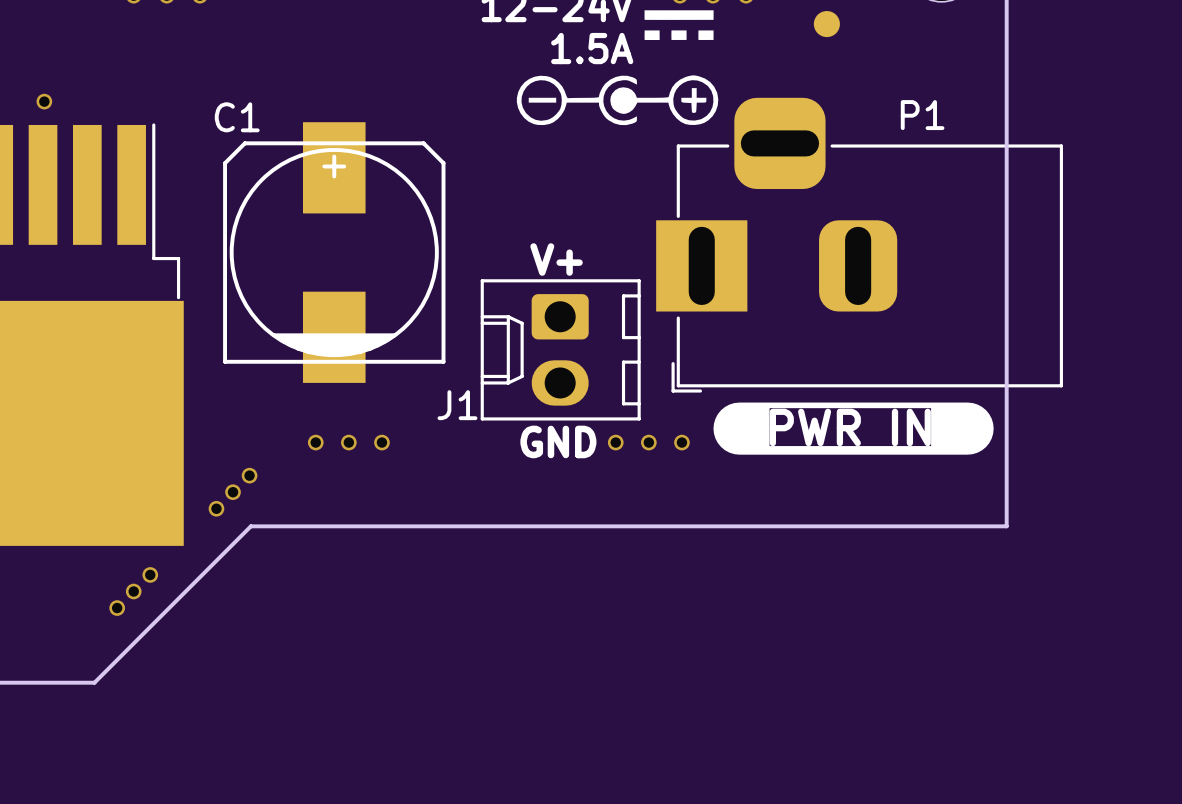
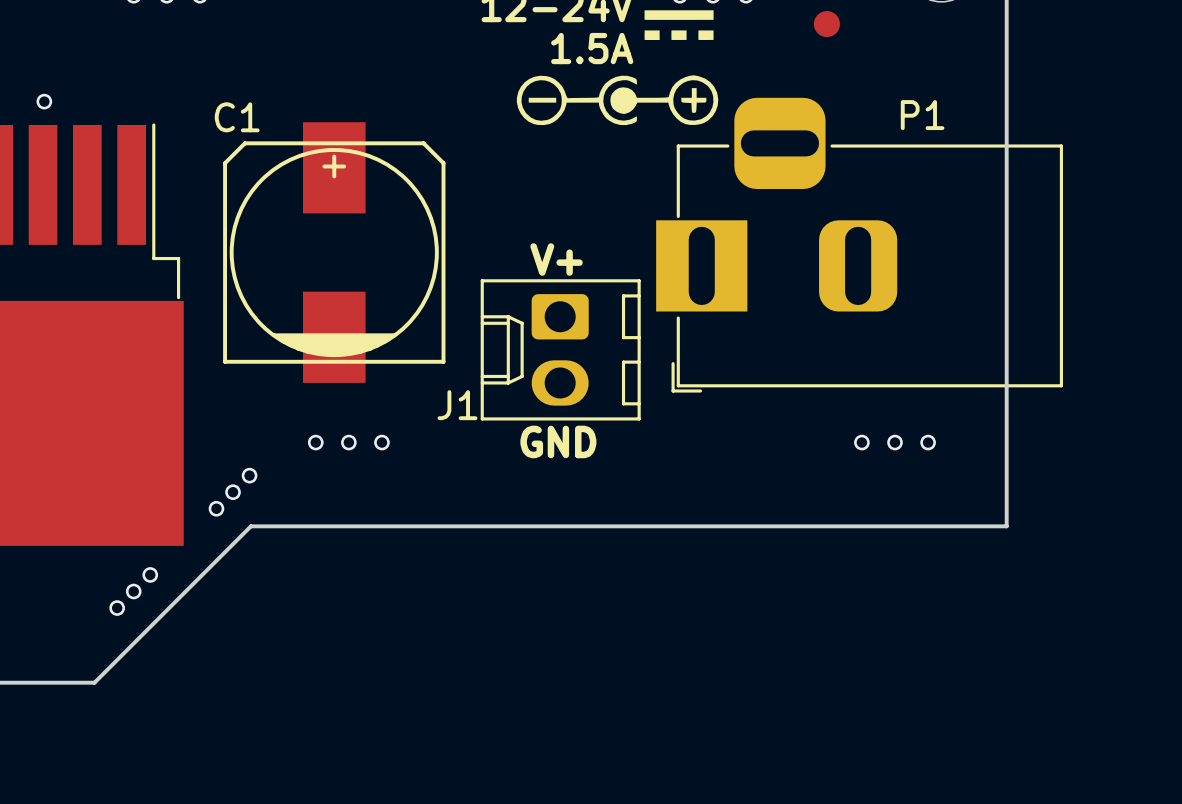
drawing: [713, 402, 994, 455] -> none
text: PWR IN (850, 427) -> none
via: (615, 442) -> none
via: (648, 442) -> none
via: (681, 442) -> none
via: none -> (861, 442)
via: none -> (895, 442)
via: none -> (928, 442)

